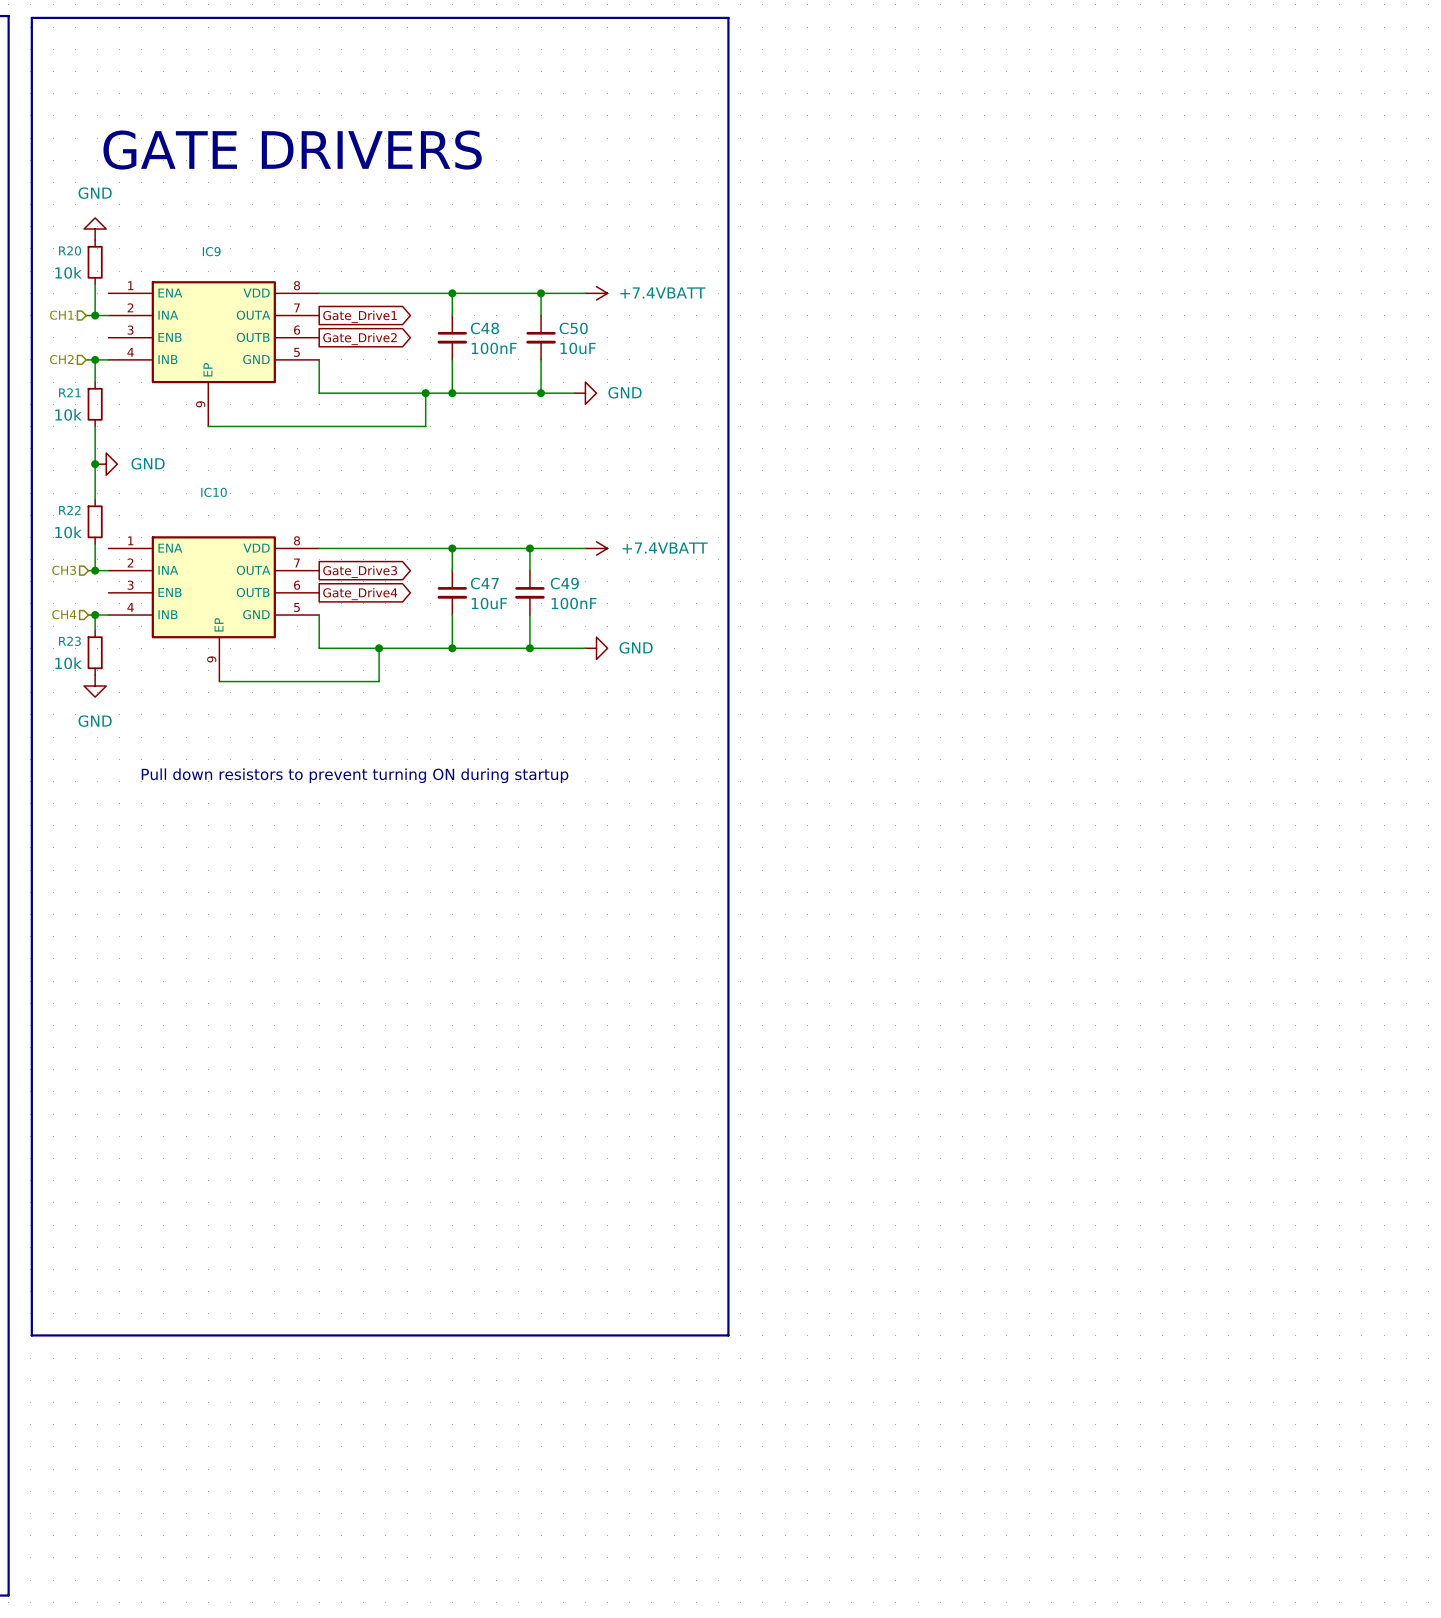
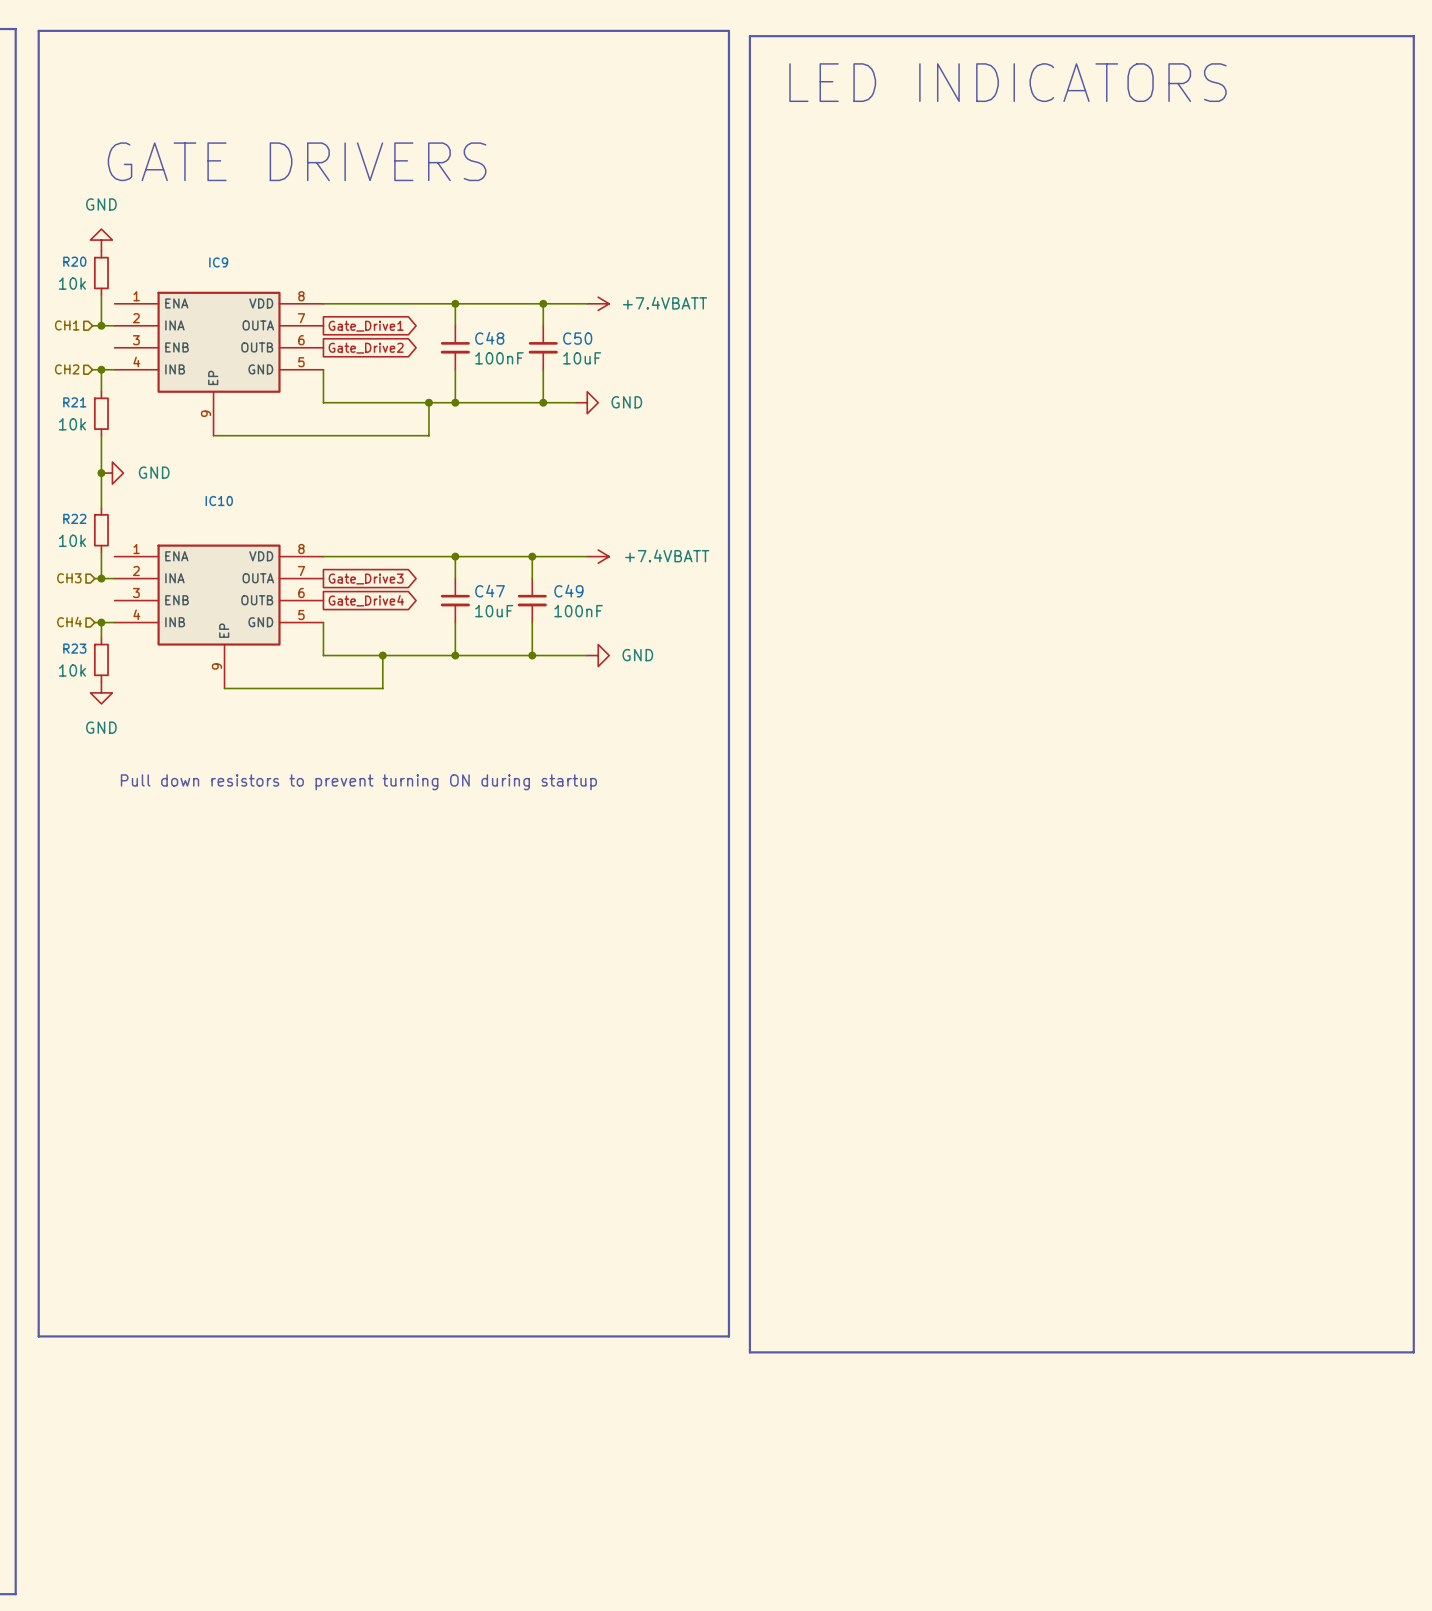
line: none -> (749, 36) (1413, 36) (1413, 1352) (749, 1352) (749, 36)
text: none -> LED INDICATORS (1008, 82)

